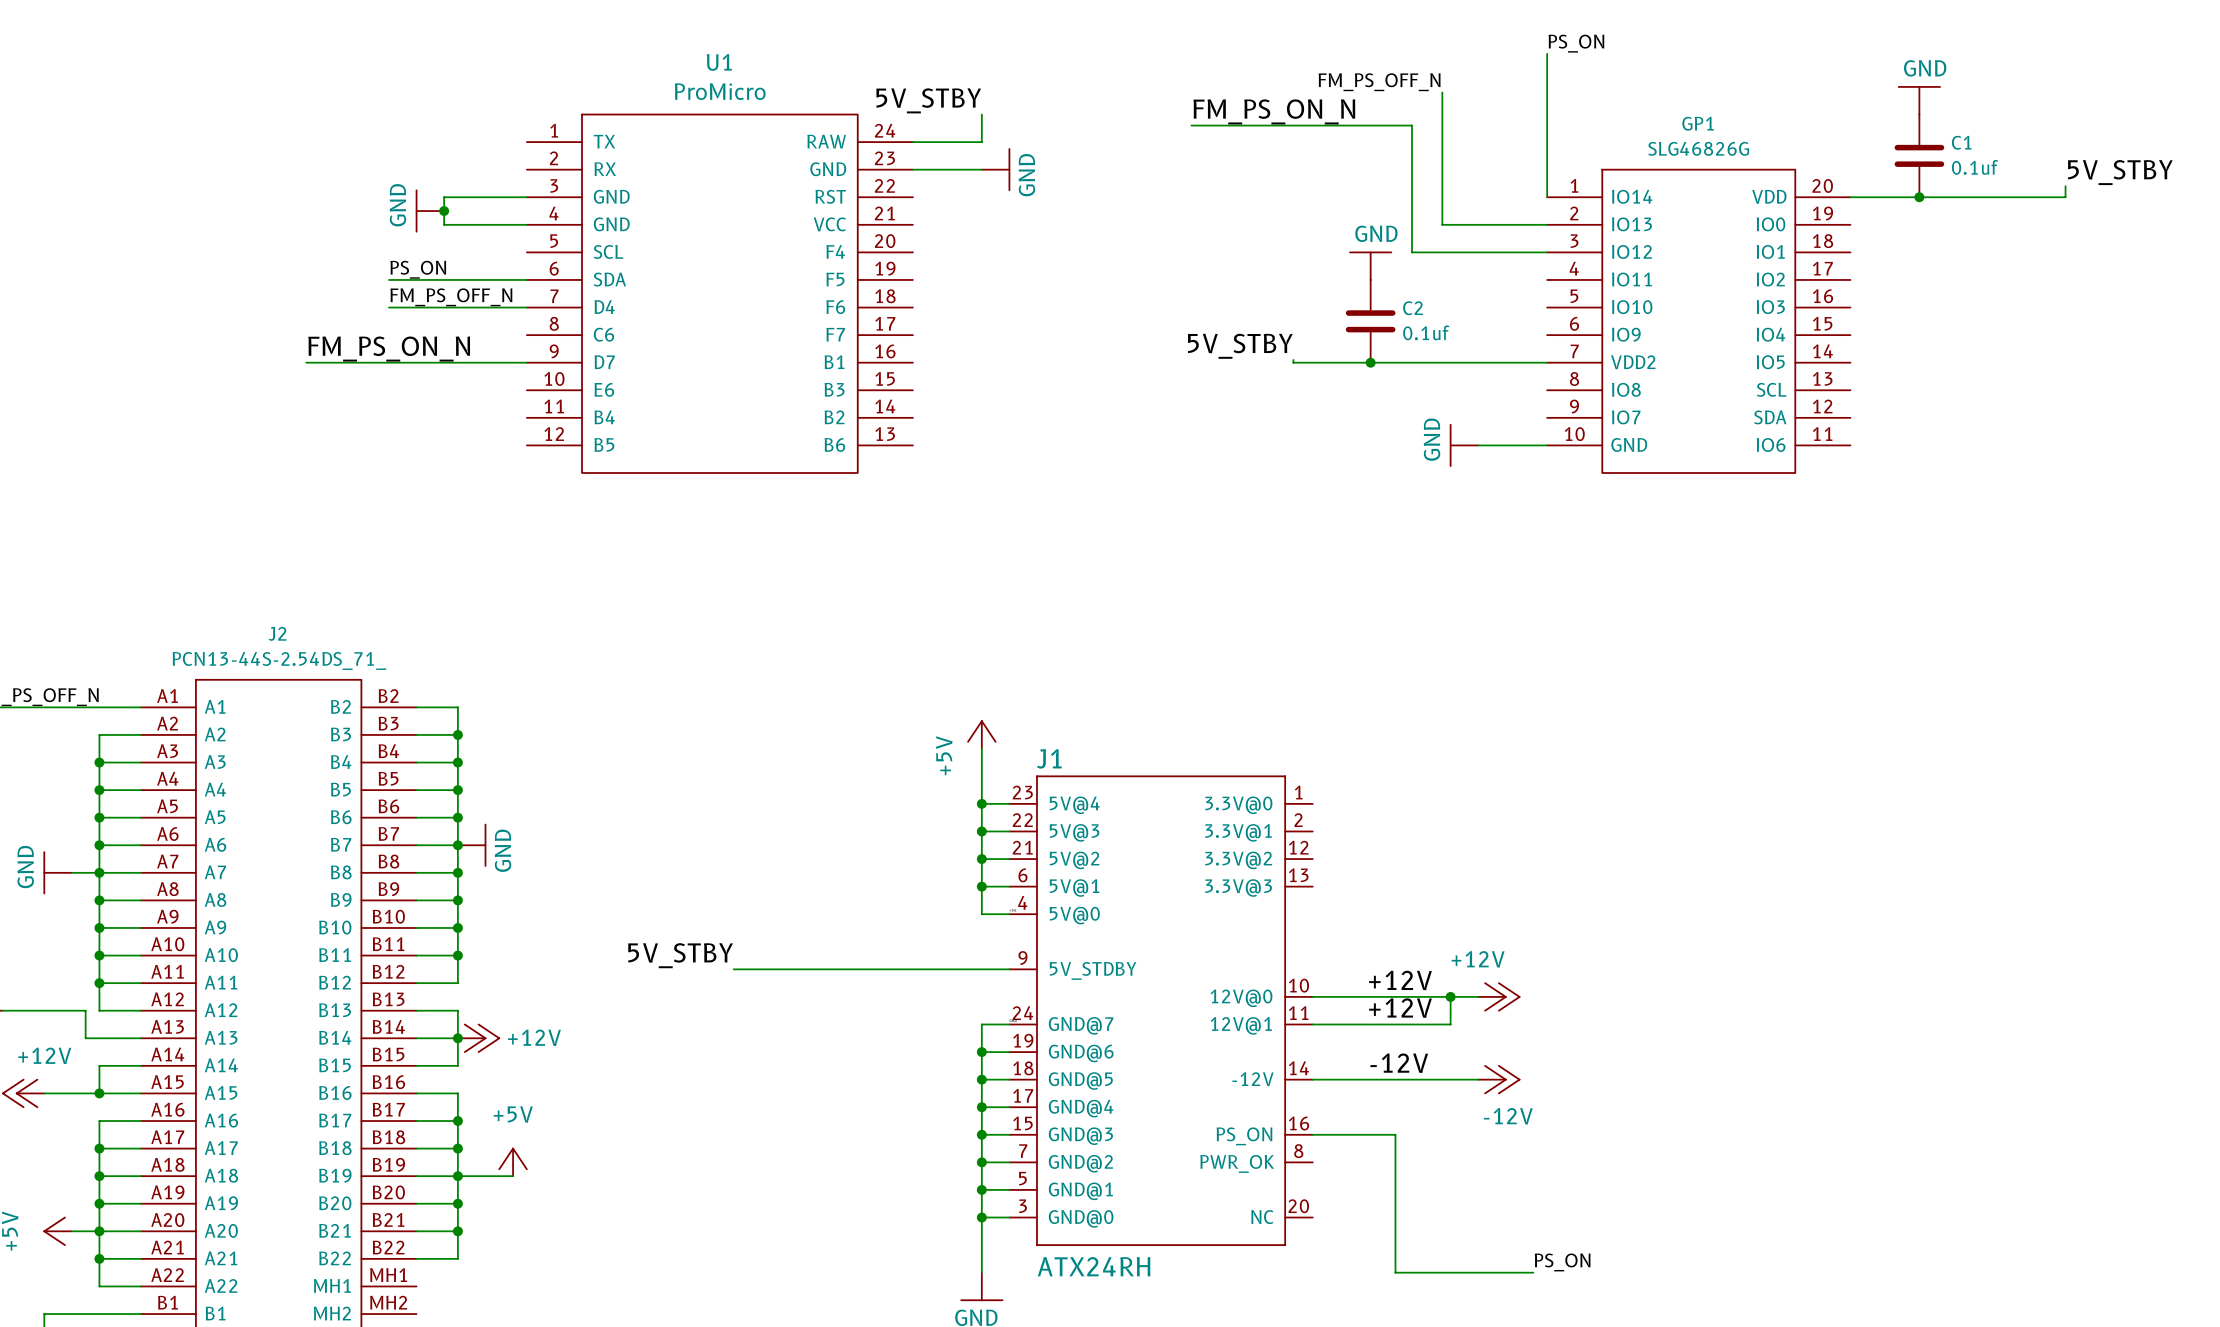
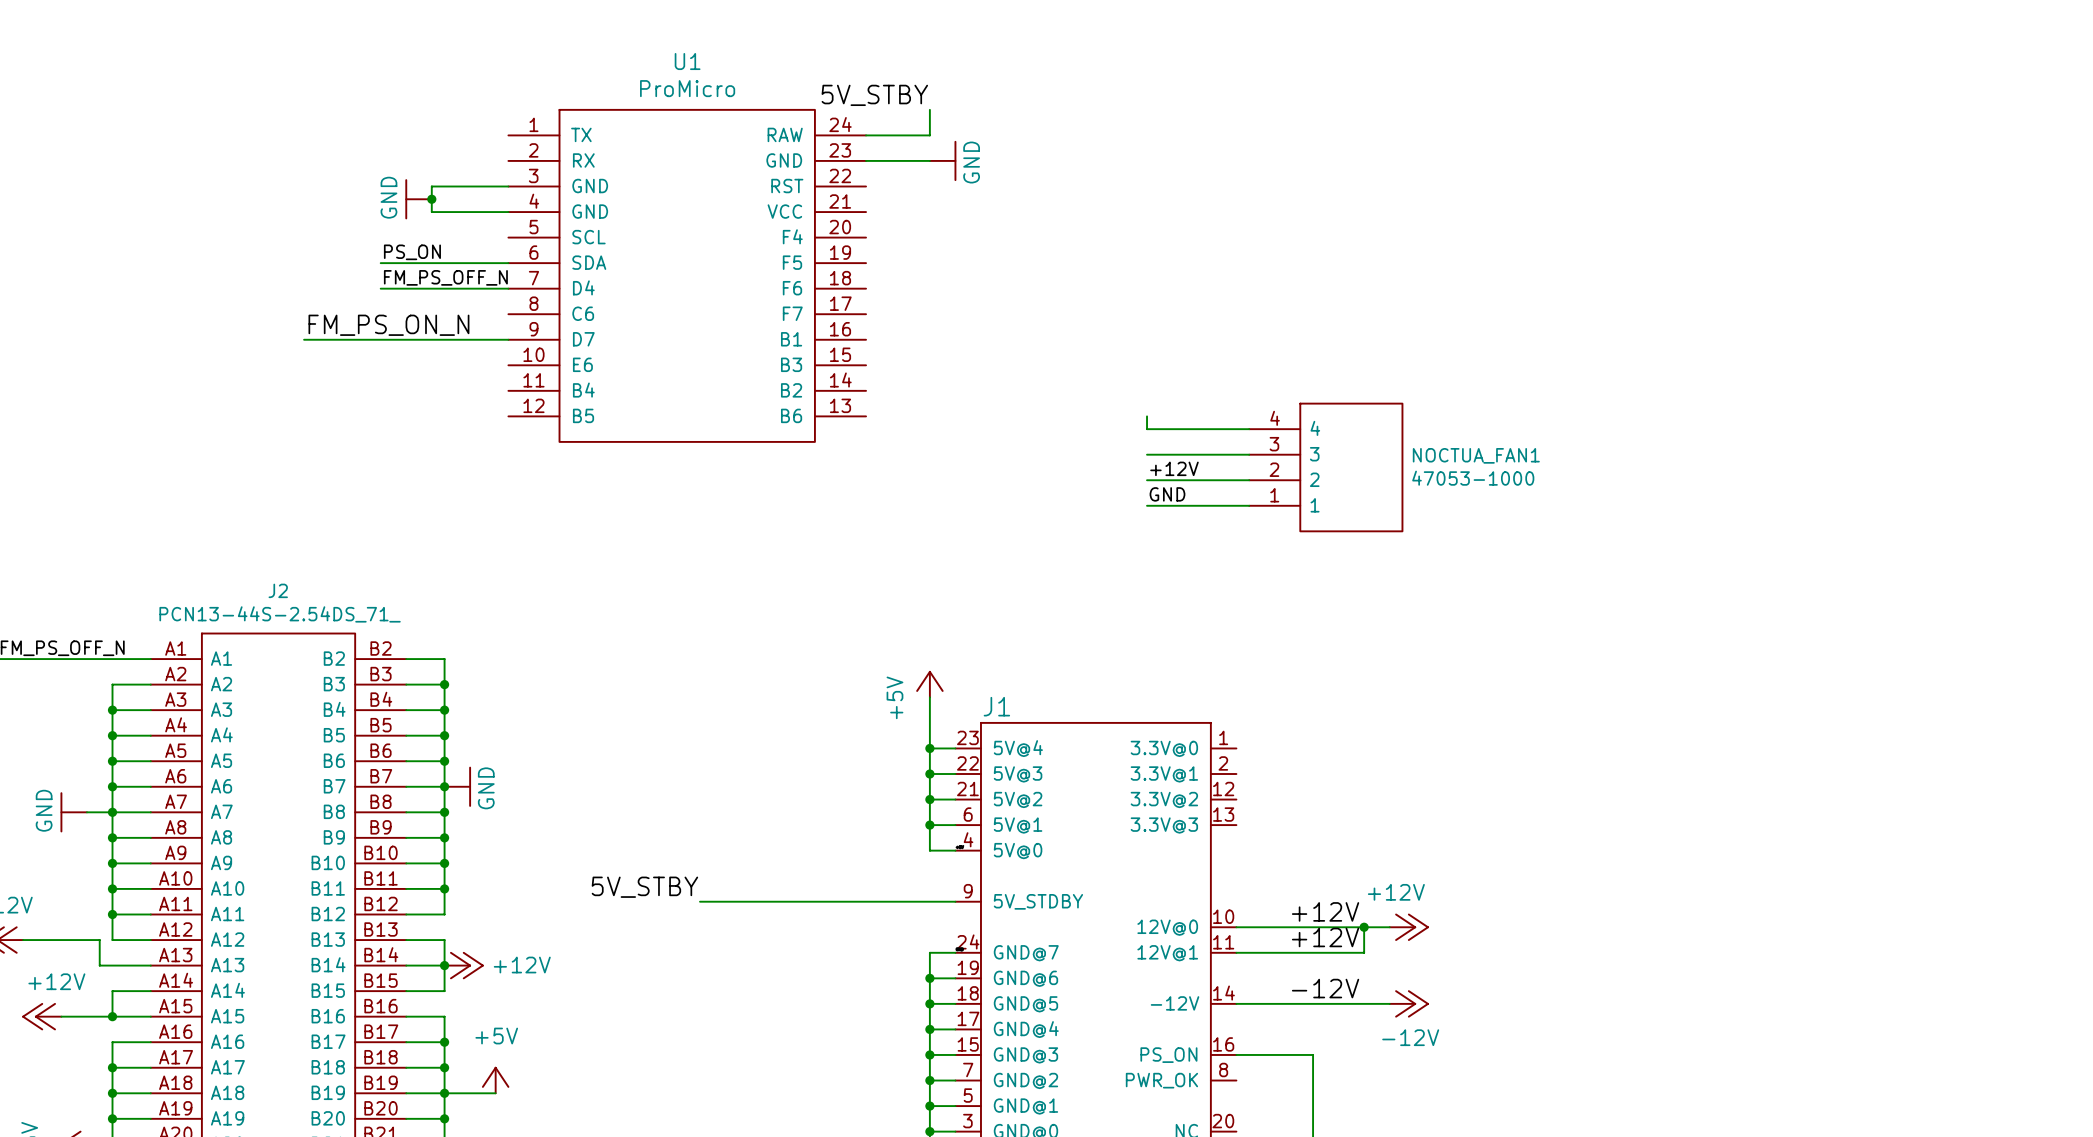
label: PS_ON (1576, 43) -> none
wire: (1547, 53) (1547, 197) -> none
label: FM_PS_OFF_N (1379, 82) -> none
wire: (1442, 92) (1442, 224) (1547, 224) -> none
power symbol: GND (1919, 100) -> none
label: FM_PS_ON_N (1274, 111) -> none
wire: (1191, 125) (1412, 125) (1412, 252) (1547, 252) -> none
C1: 0.1uf (1919, 155) -> none
label: 5V_STBY (2120, 172) -> none
wire: (2065, 186) (2065, 197) (1850, 197) -> none
junction: (1919, 197) -> none
power symbol: GND (1370, 266) -> none
C2: 0.1uf (1370, 321) -> none
GP1: SLG46826G (1698, 321) -> none
label: 5V_STBY (1240, 346) -> none
wire: (1293, 359) (1293, 362) (1547, 362) -> none
junction: (1370, 362) -> none
wire: none -> (1147, 416) (1147, 429) (1249, 429)
power symbol: GND (1464, 445) -> none
wire: (1478, 445) (1547, 445) -> none
wire: none -> (1147, 454) (1249, 454)
NOCTUA_FAN1: none -> 47053-1000 (1326, 467)
label: none -> +12V (1174, 468)
wire: none -> (1147, 480) (1249, 480)
label: none -> GND (1167, 494)
wire: none -> (1147, 505) (1249, 505)

